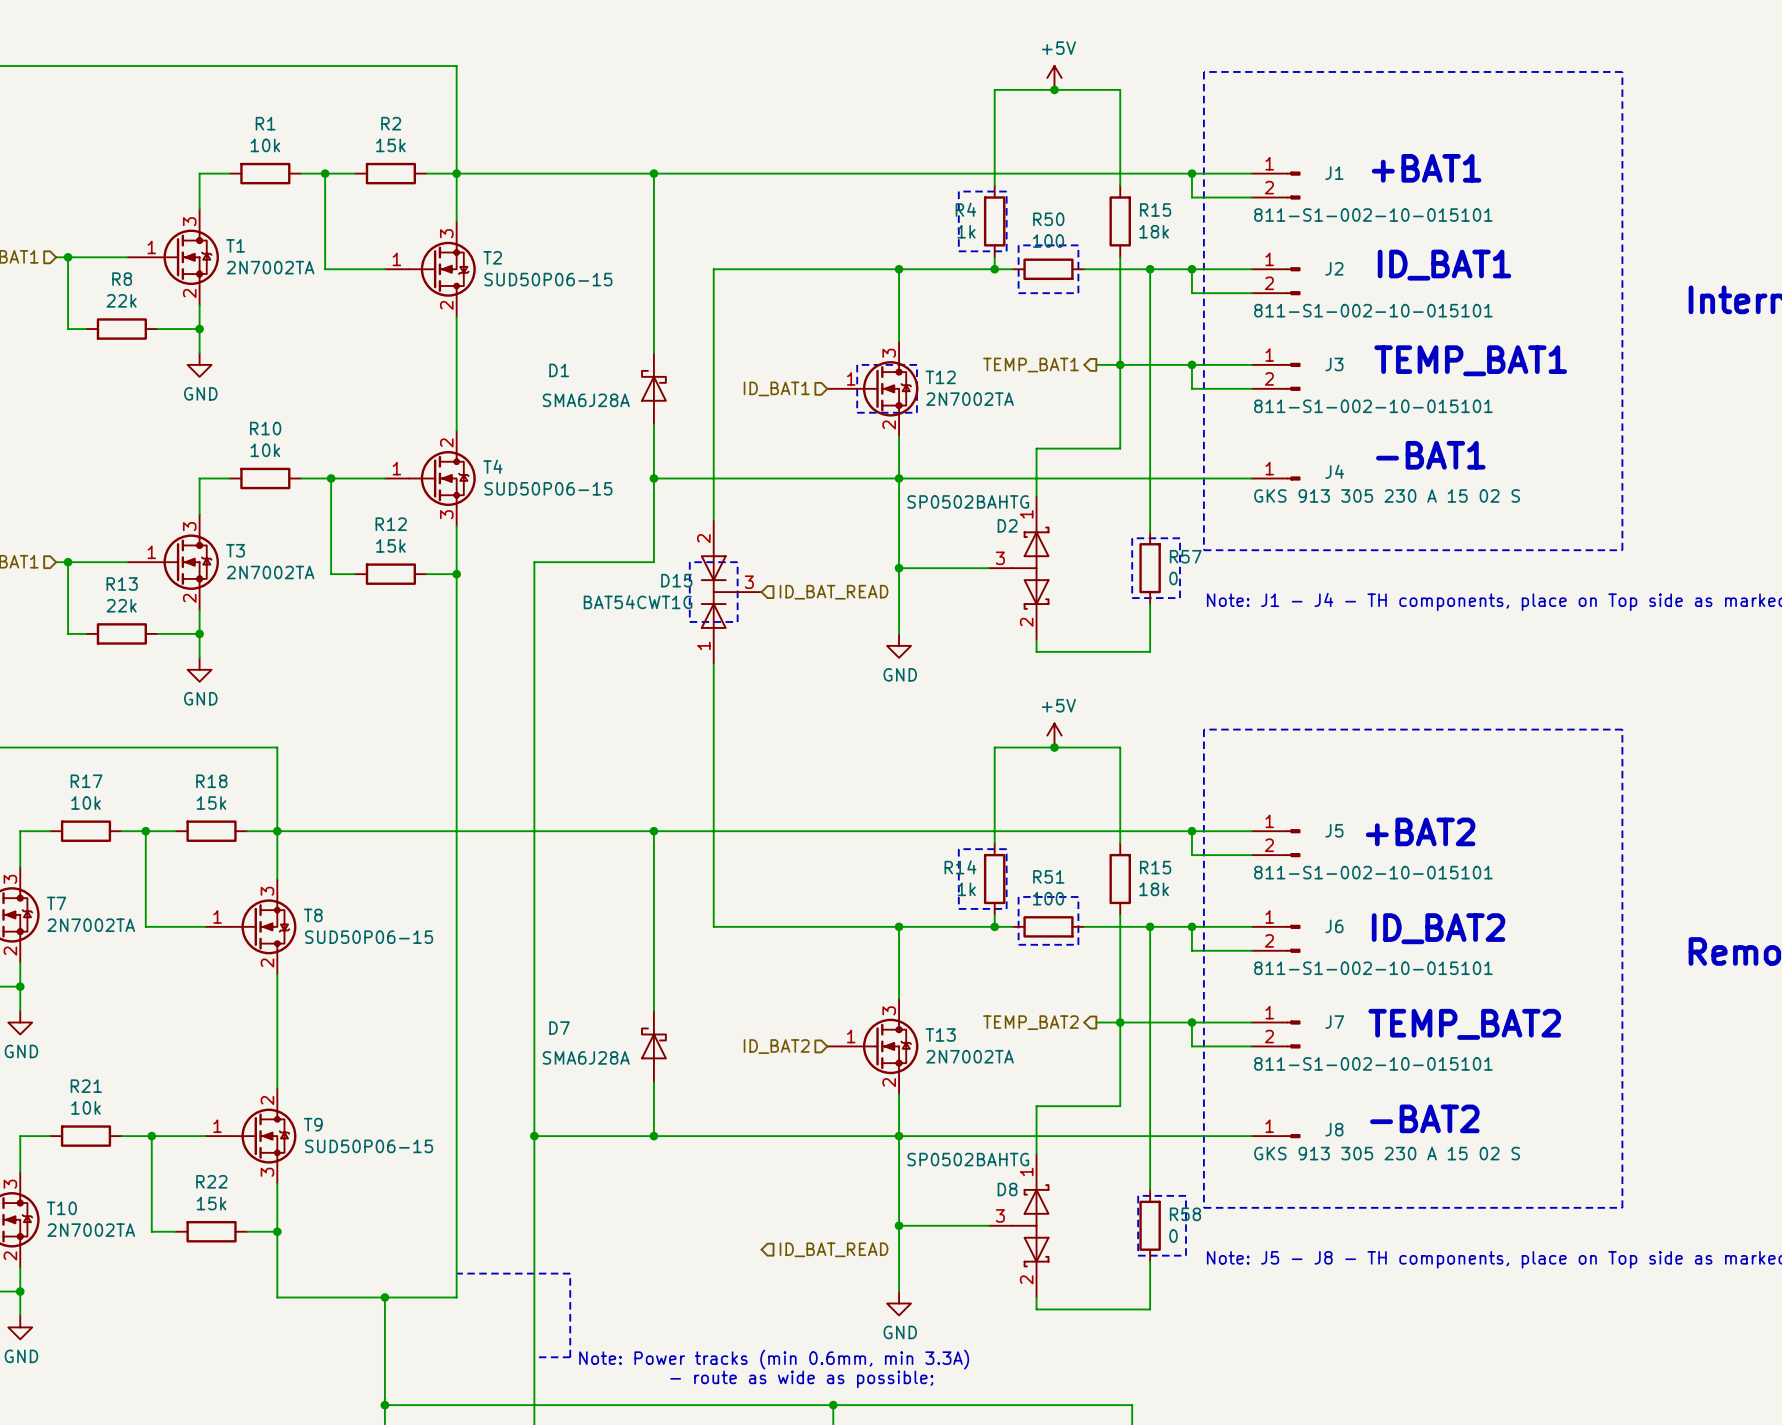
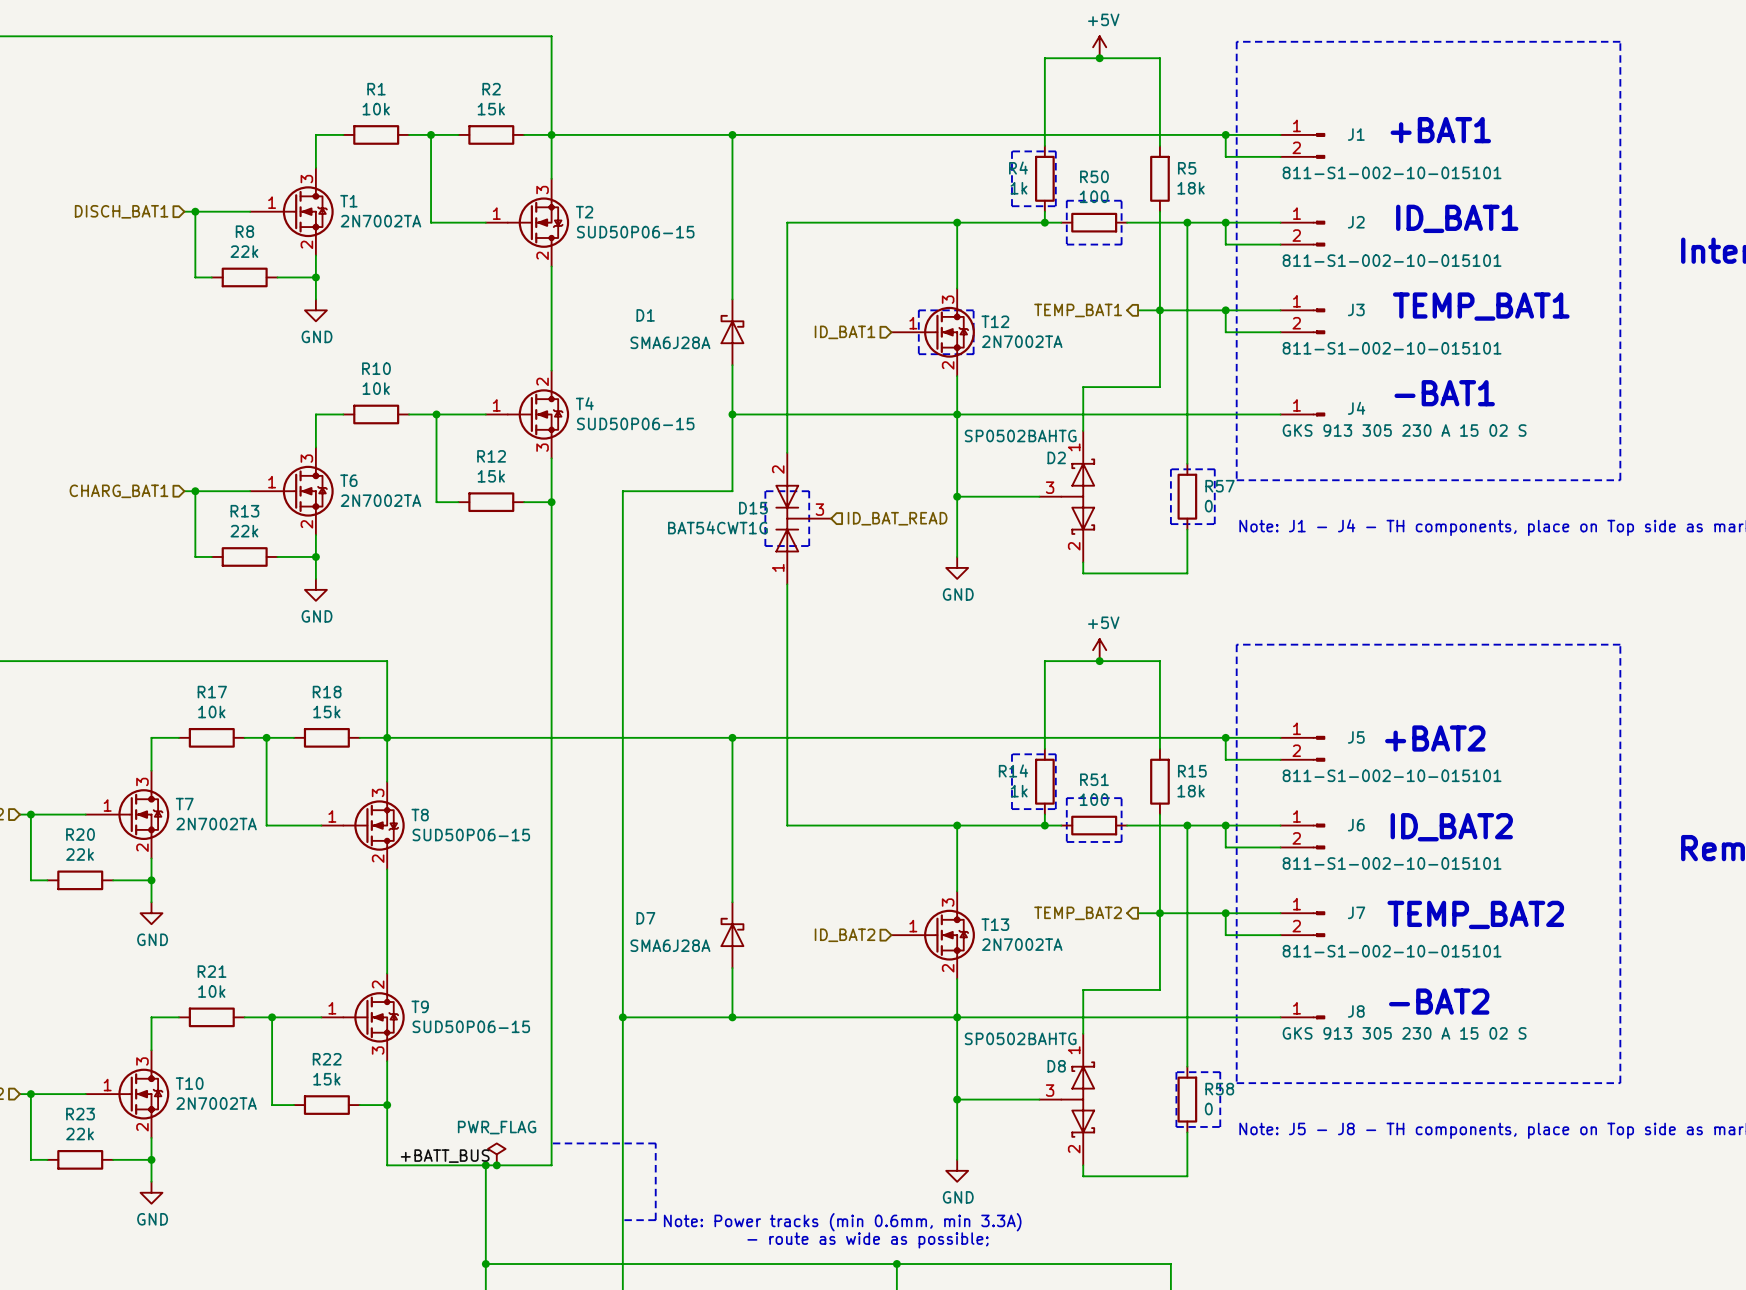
R15 name: R15 (1155, 209) -> R5 (1187, 168)
T3 name: T3 (235, 550) -> T6 (348, 480)
hierarchical label: ID_BAT_READ (834, 1249) -> none
power symbol: none -> PWR_FLAG (496, 1154)
label: none -> +BATT_BUS (445, 1156)
junction: none -> (496, 1165)

